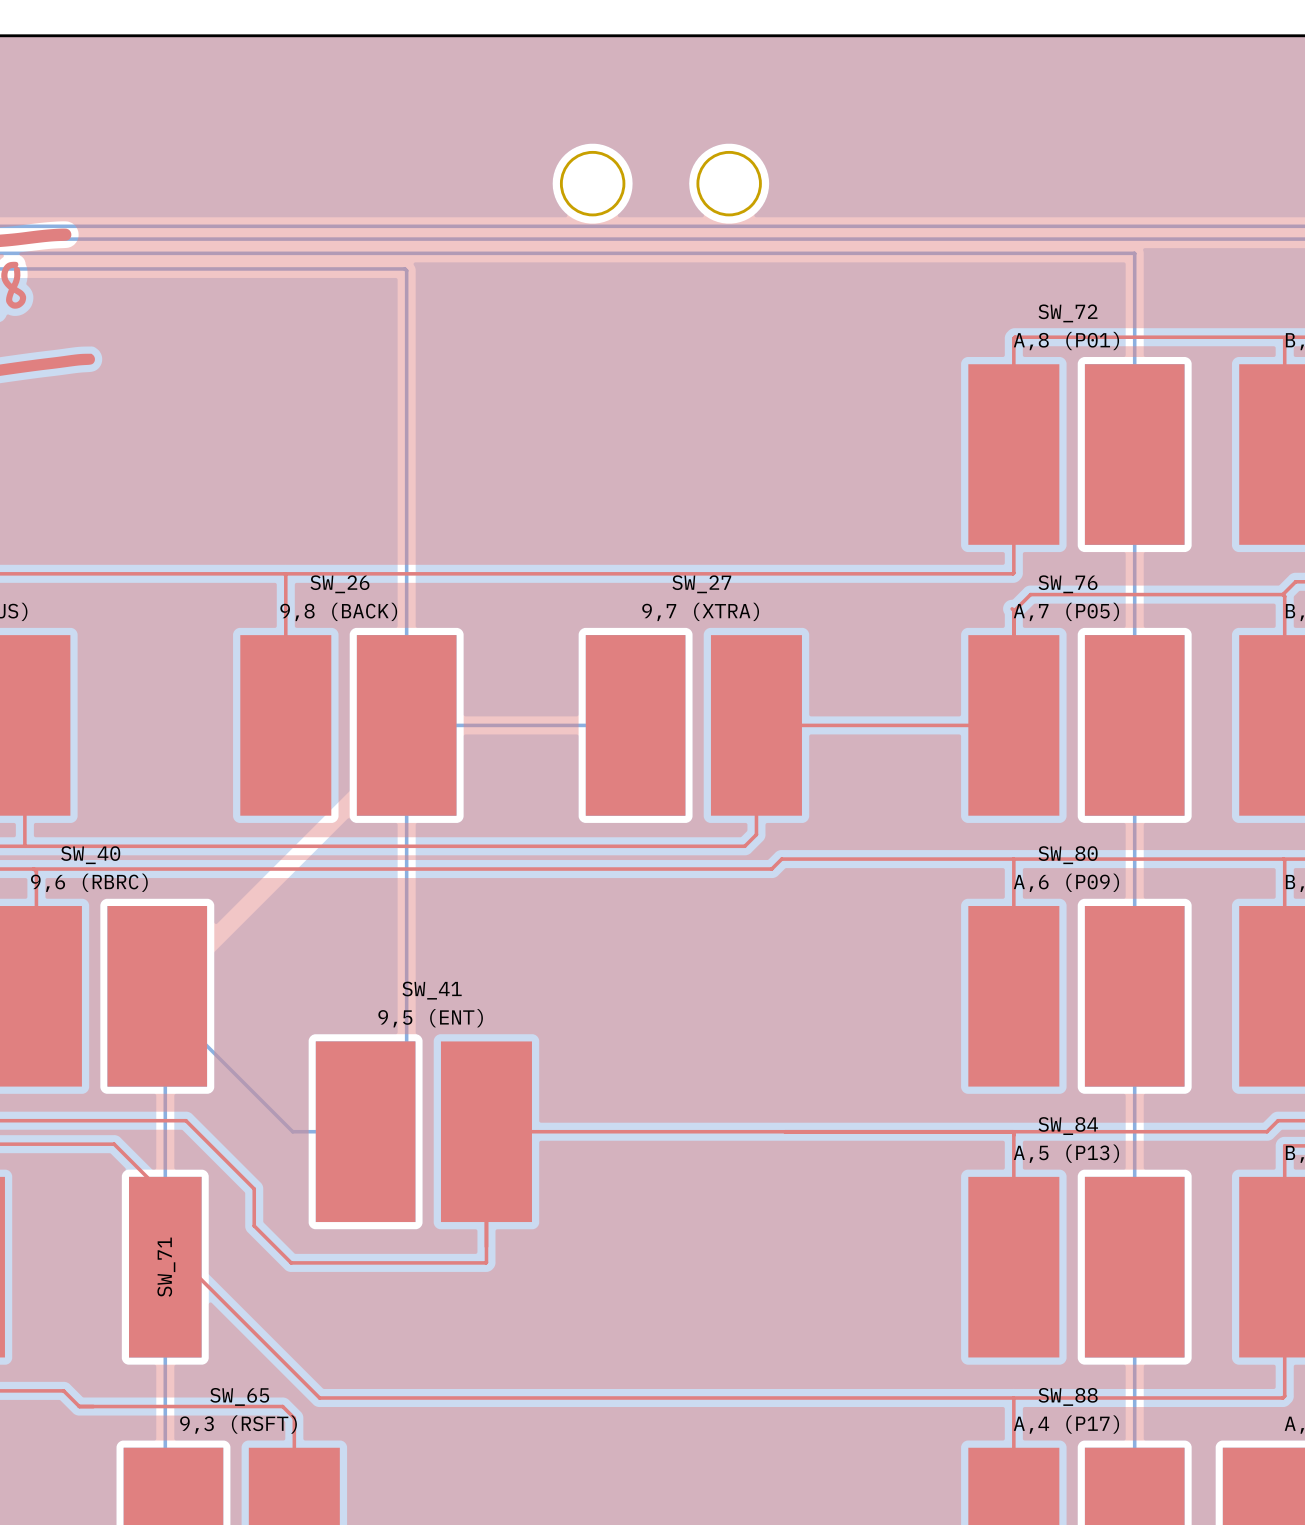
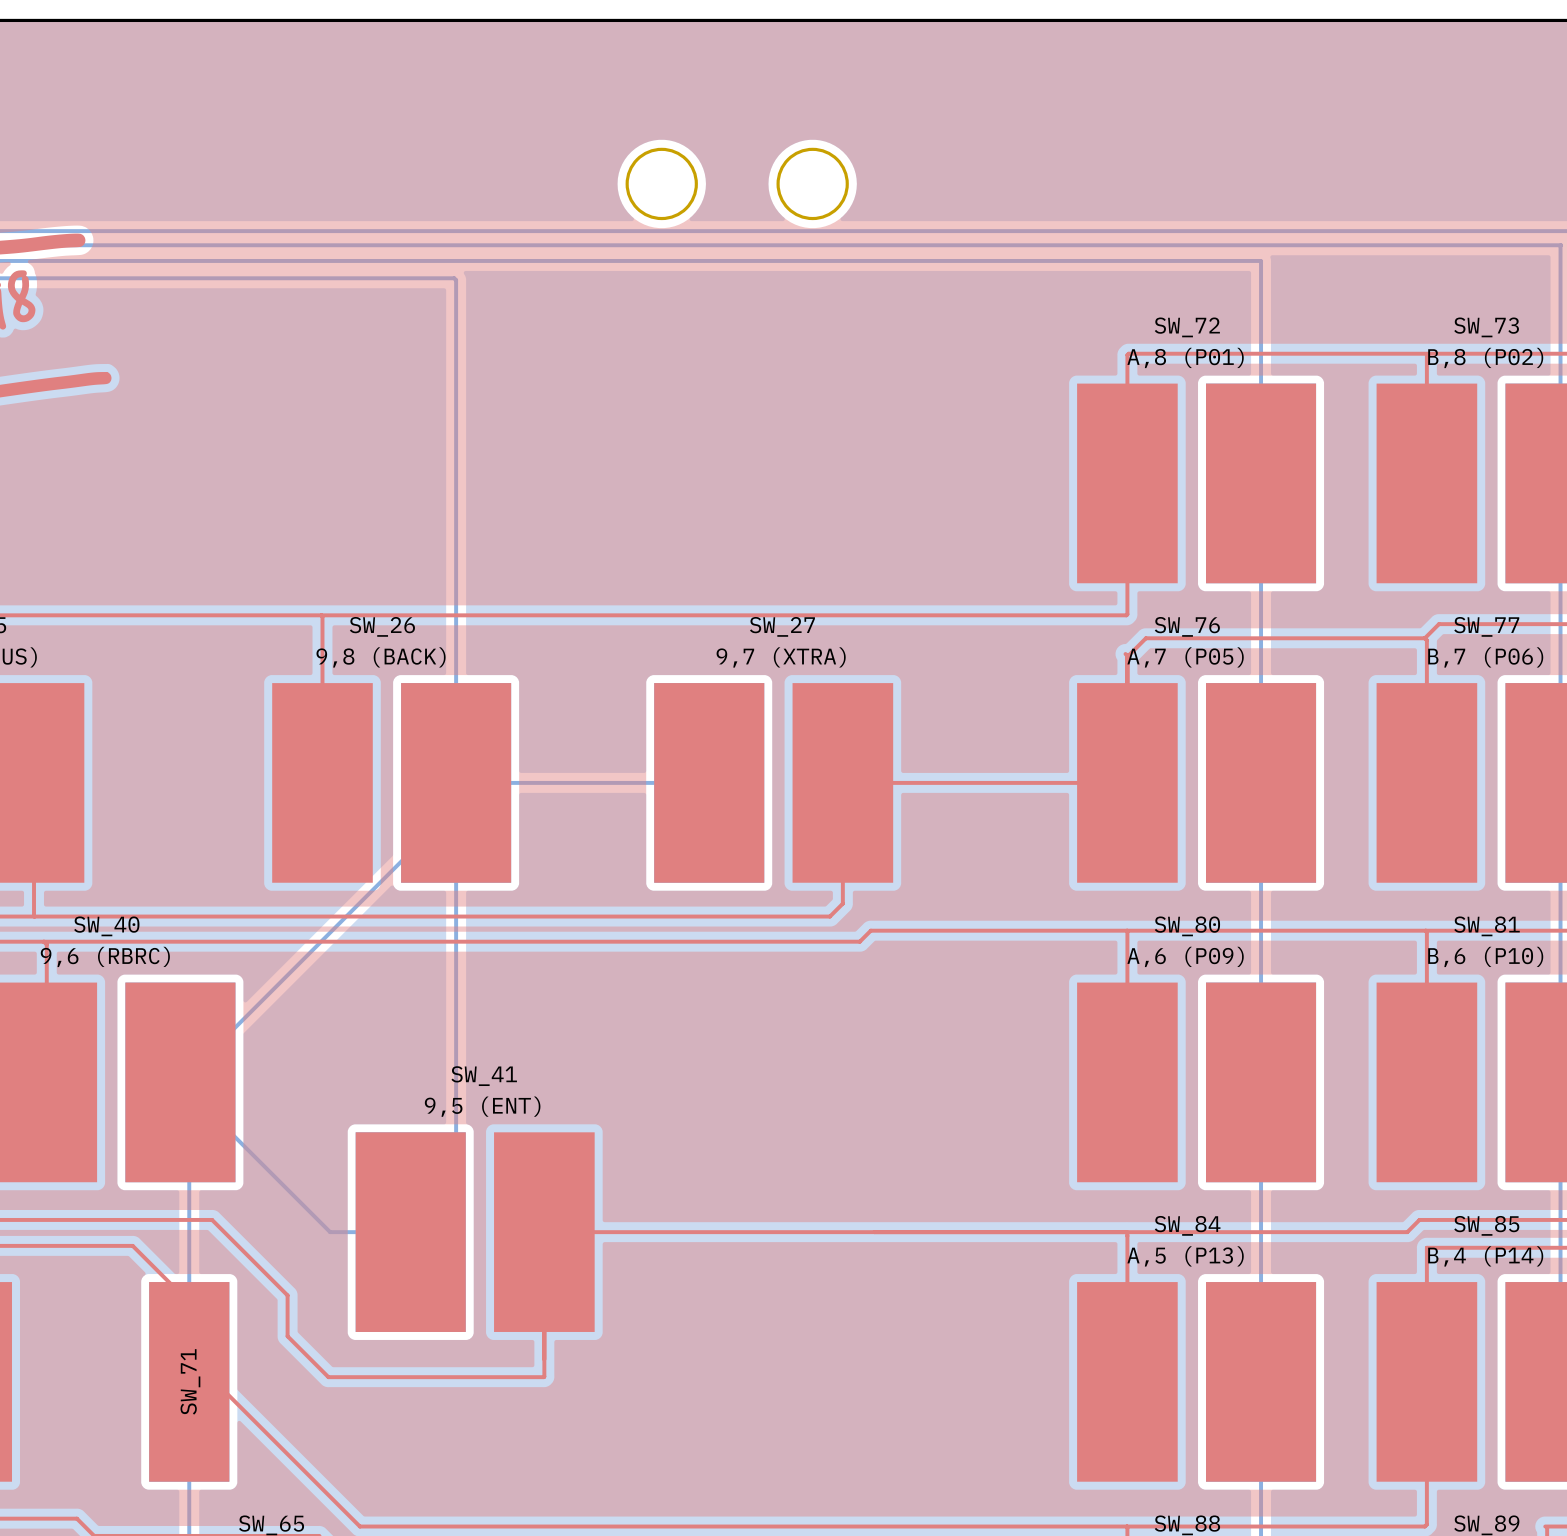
bottom track: none -> (456, 806) (180, 1082)

